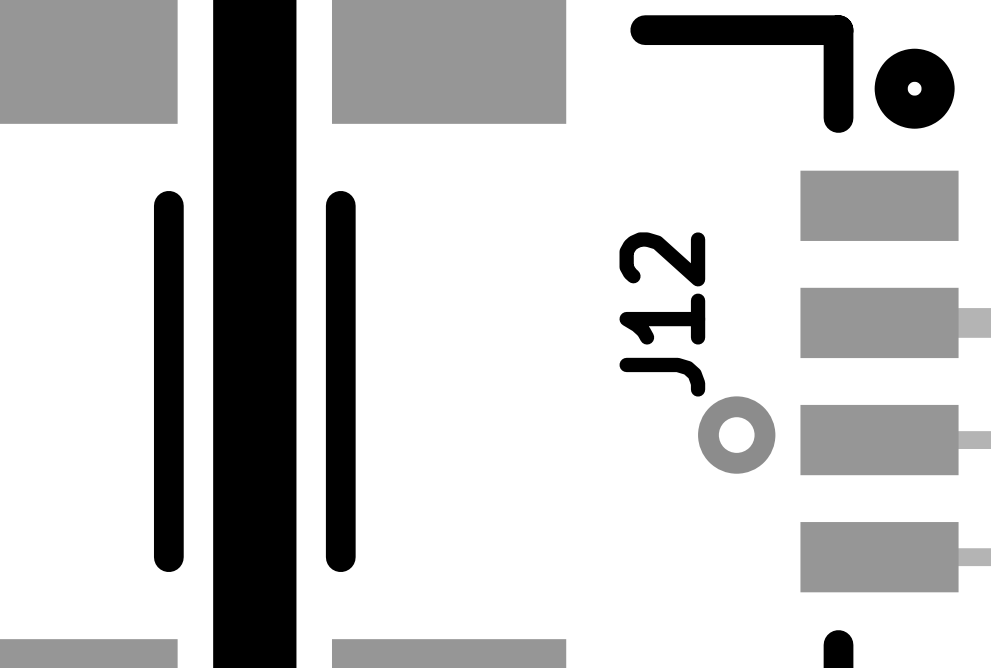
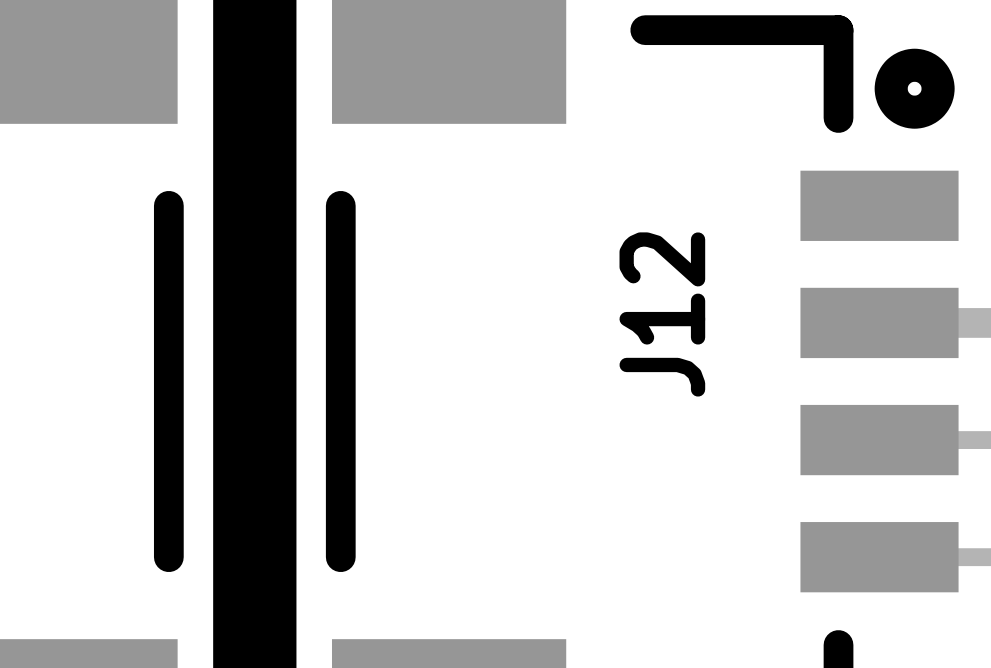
via: (736, 435) -> none

